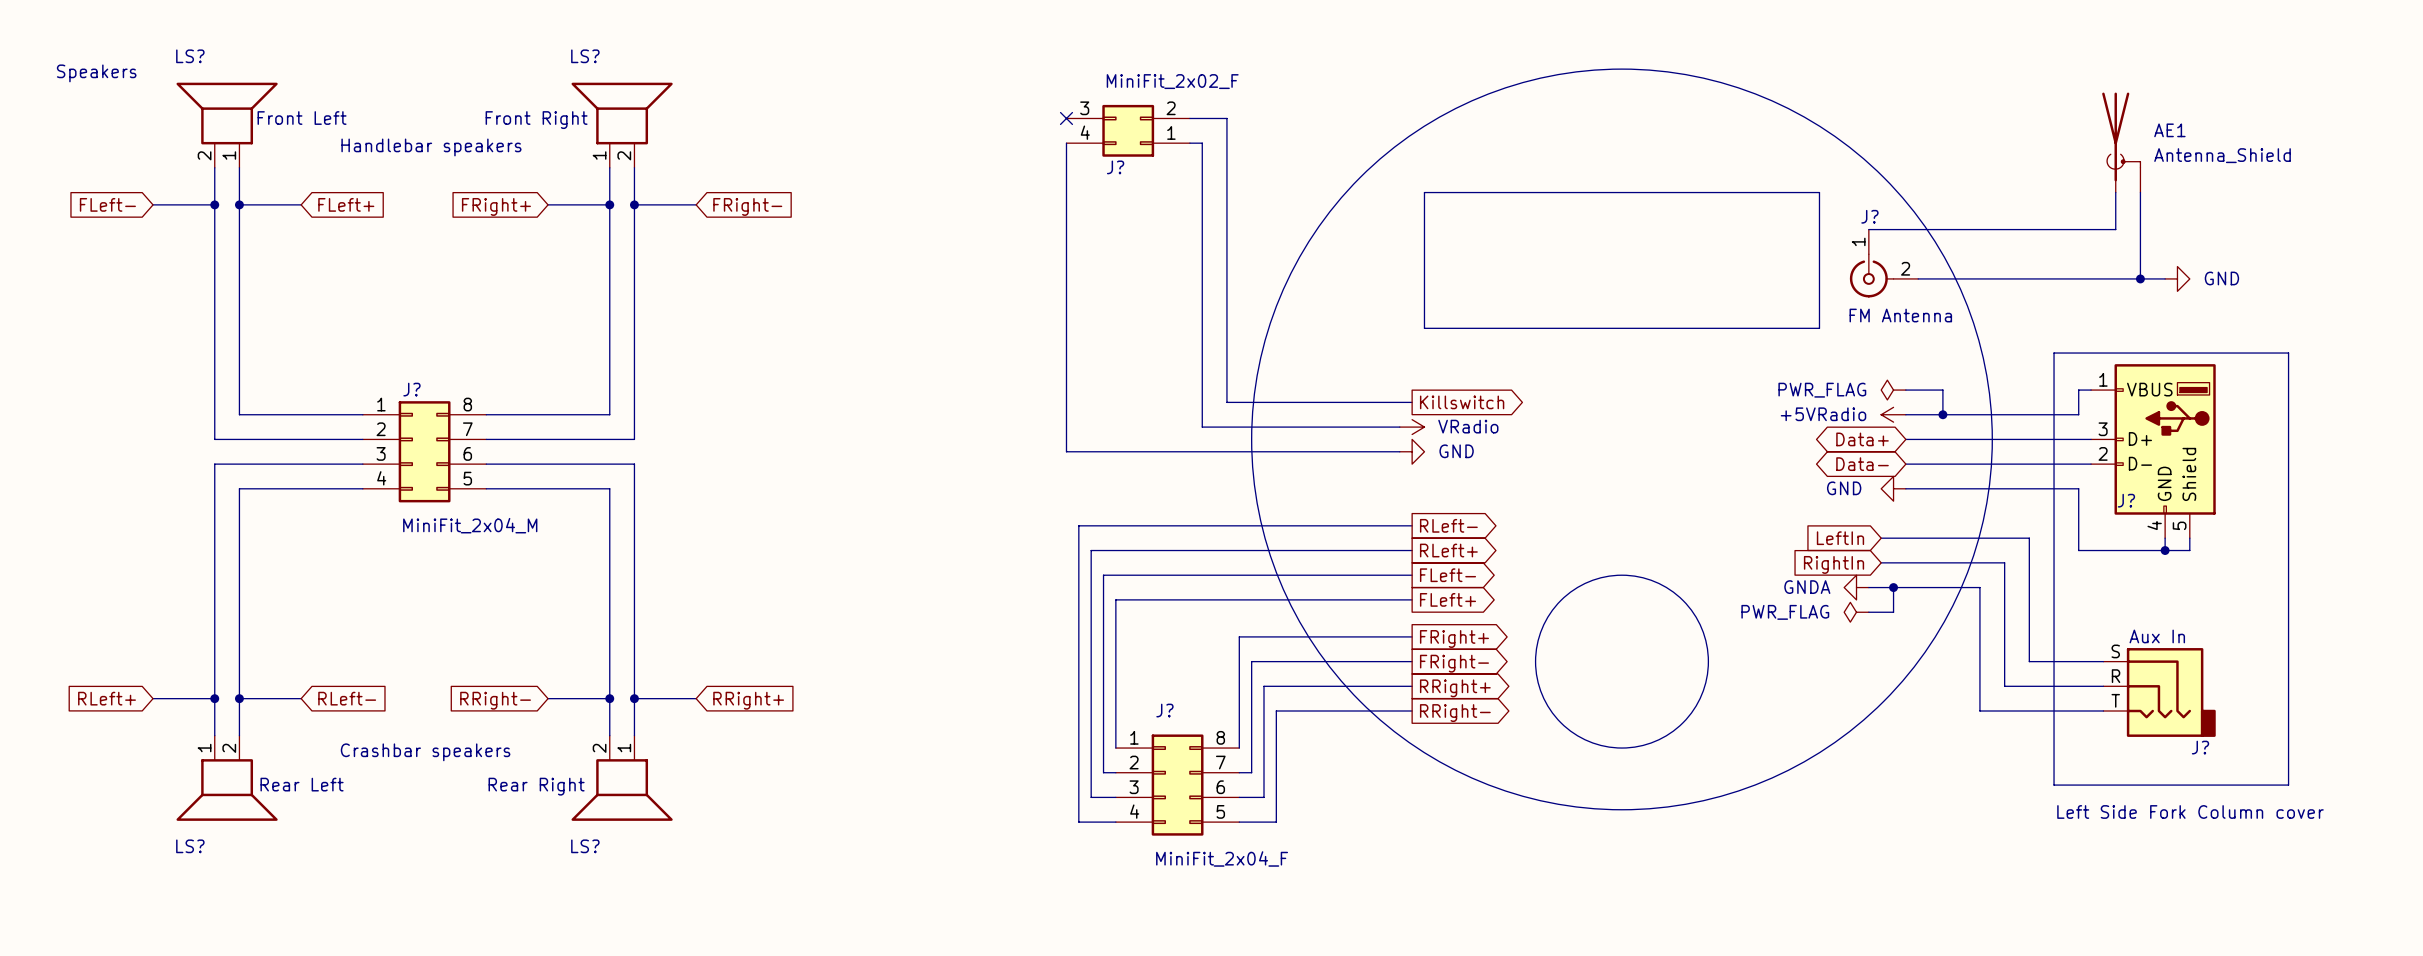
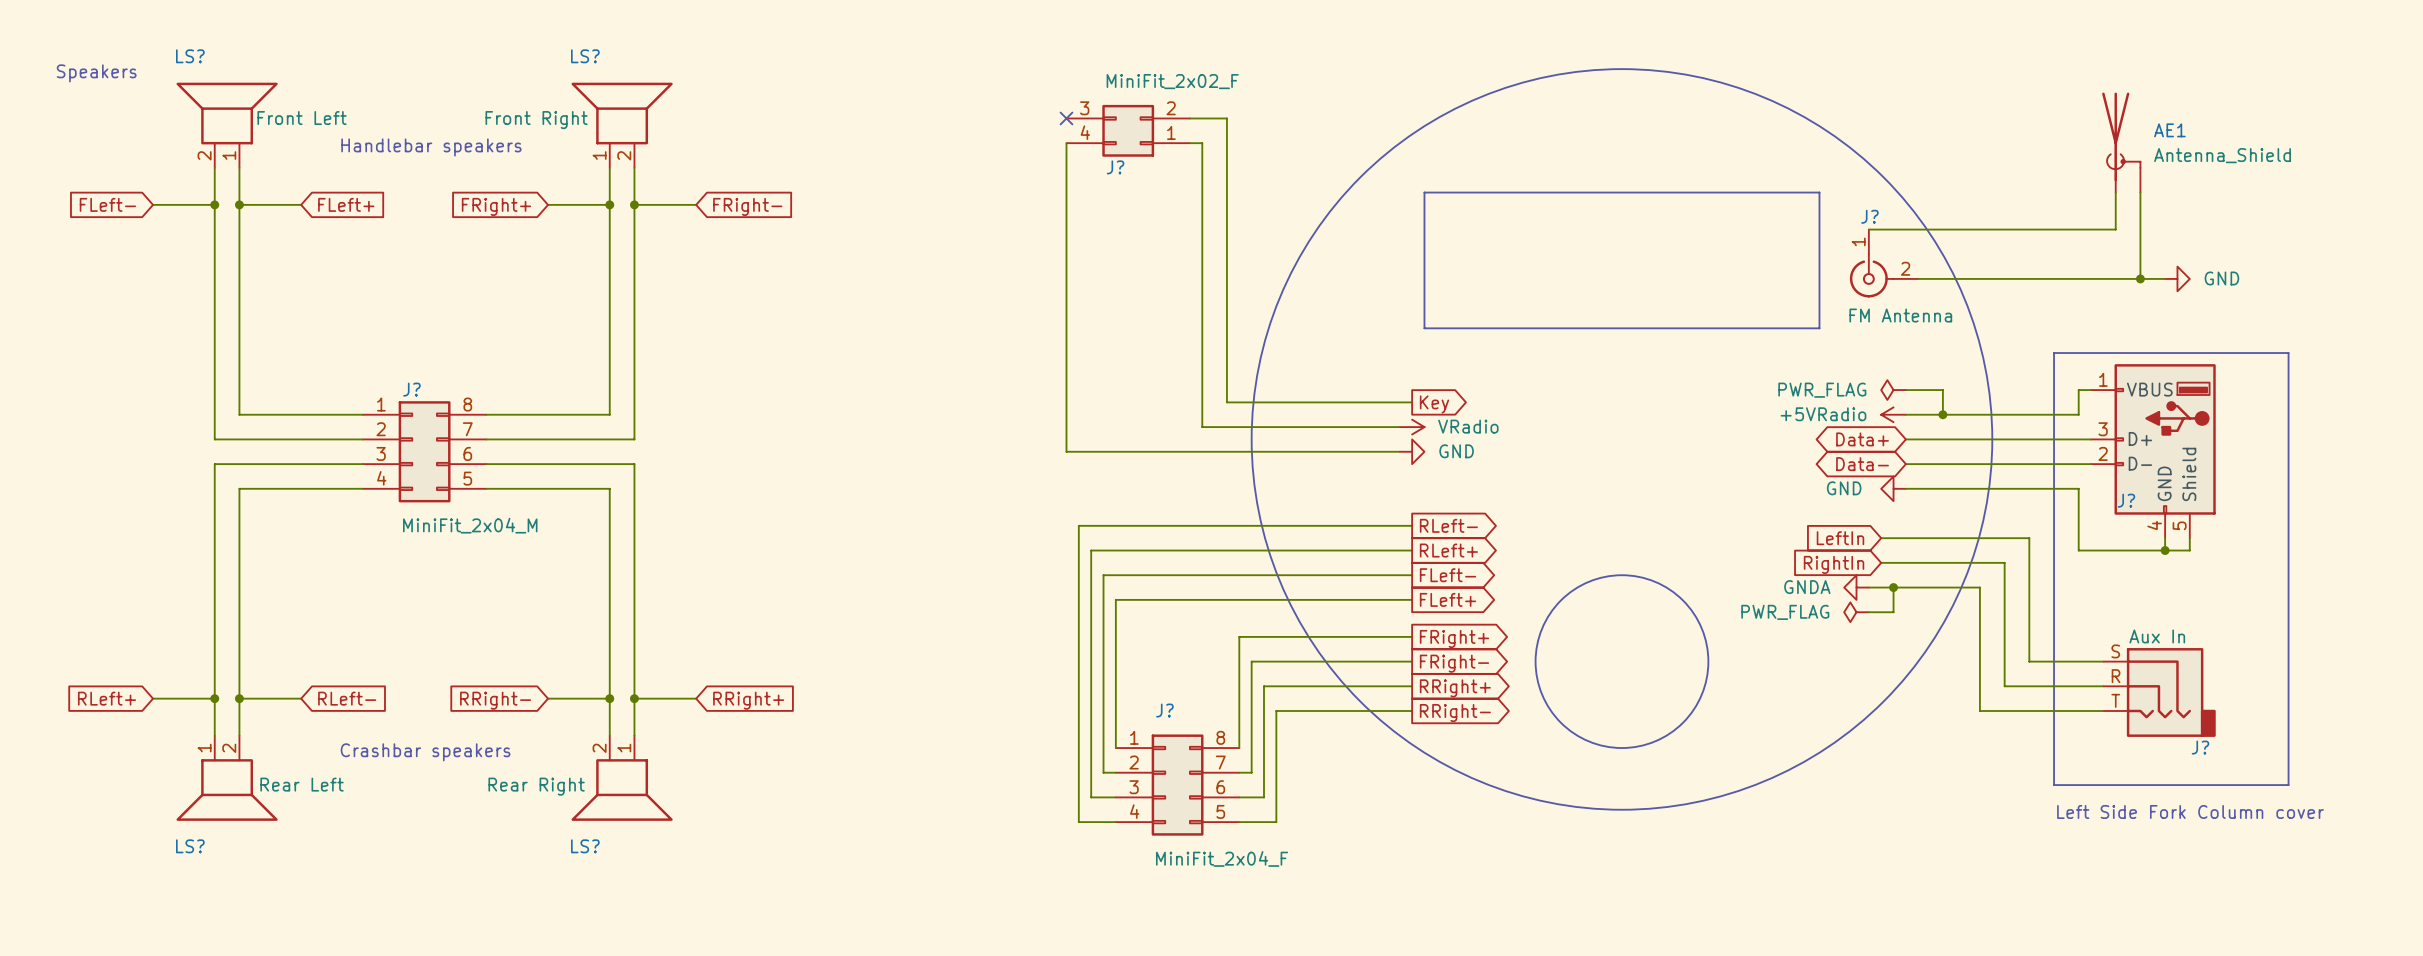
global label: Killswitch (1462, 402) -> Key (1434, 404)

